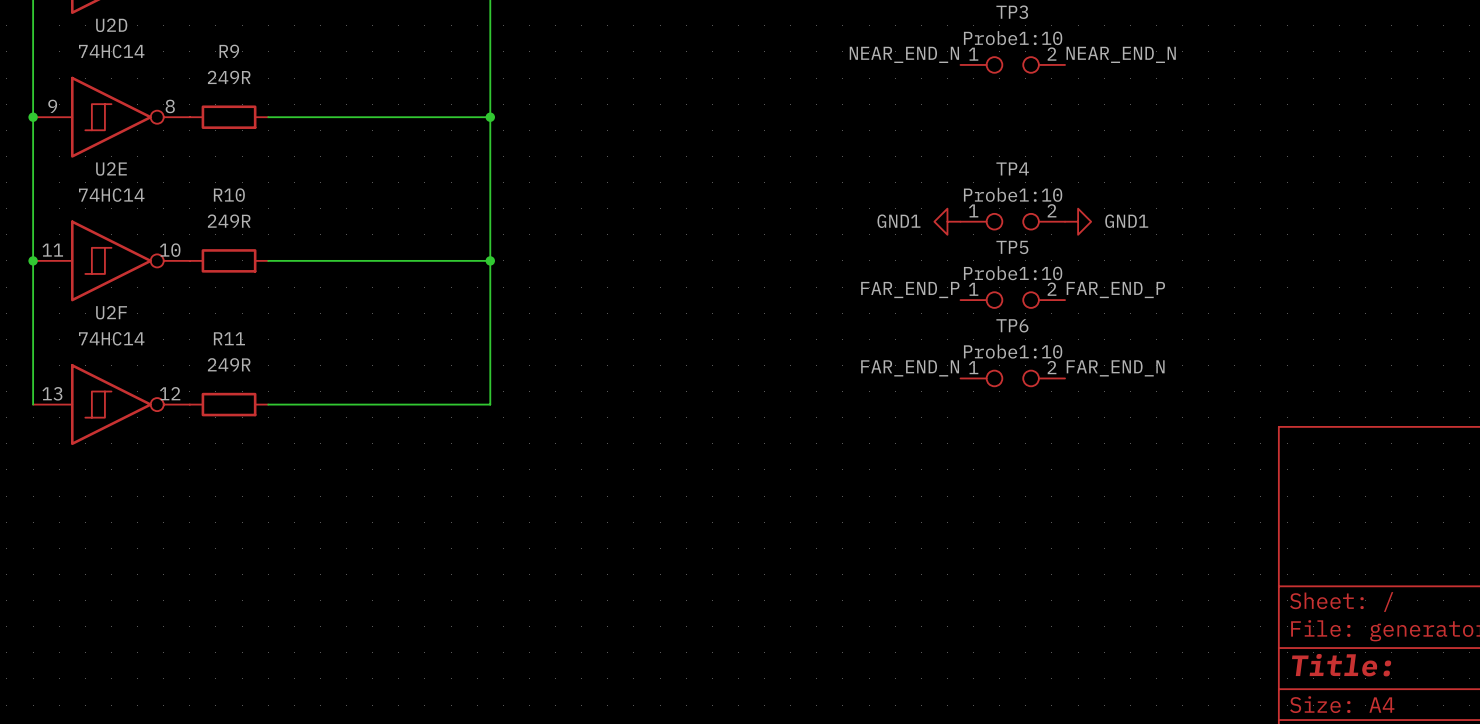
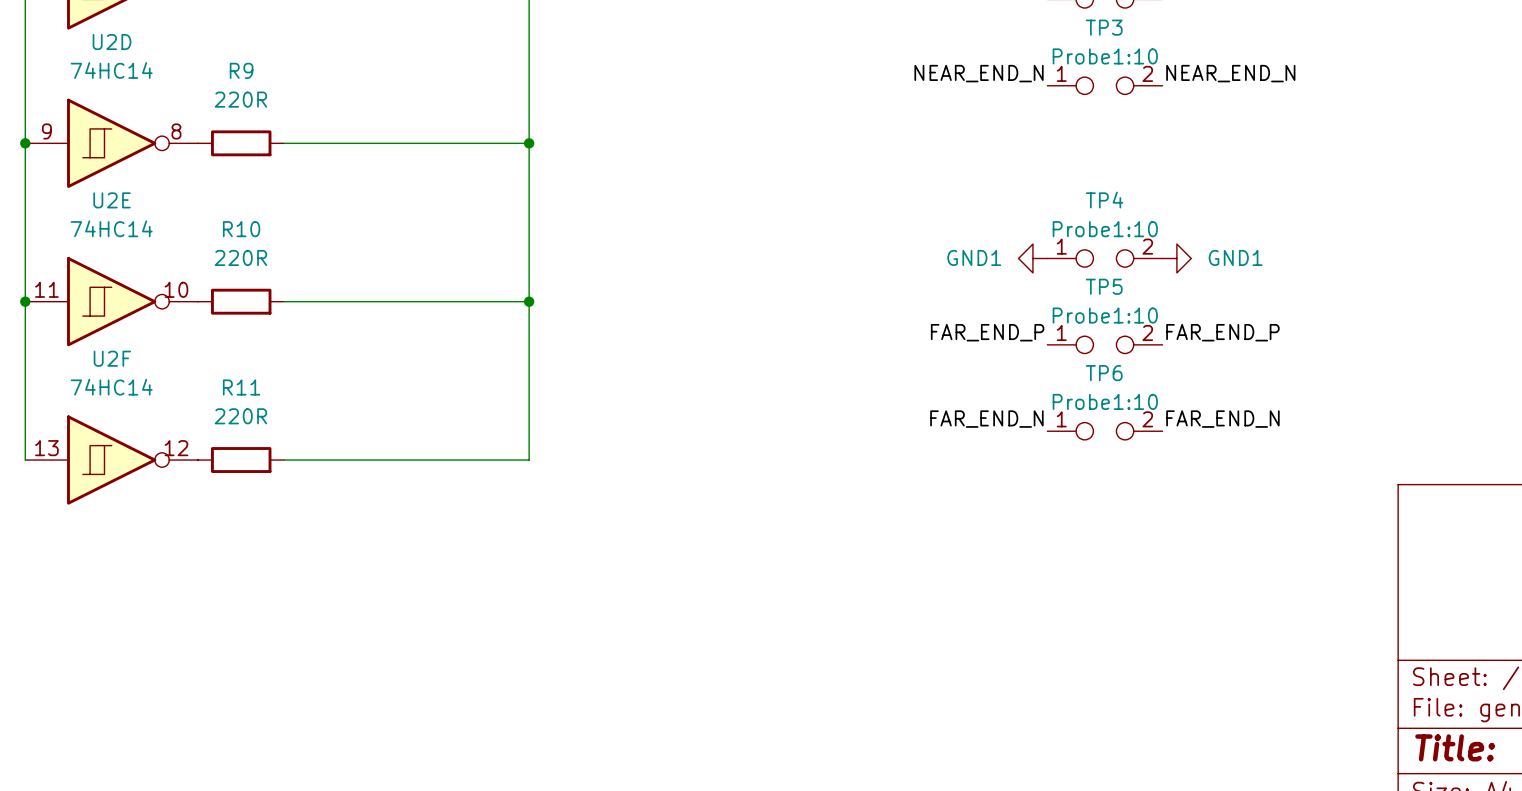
R9 value: 249R (229, 77) -> 220R (240, 99)
R10 value: 249R (229, 221) -> 220R (240, 257)
R11 value: 249R (229, 364) -> 220R (240, 416)

